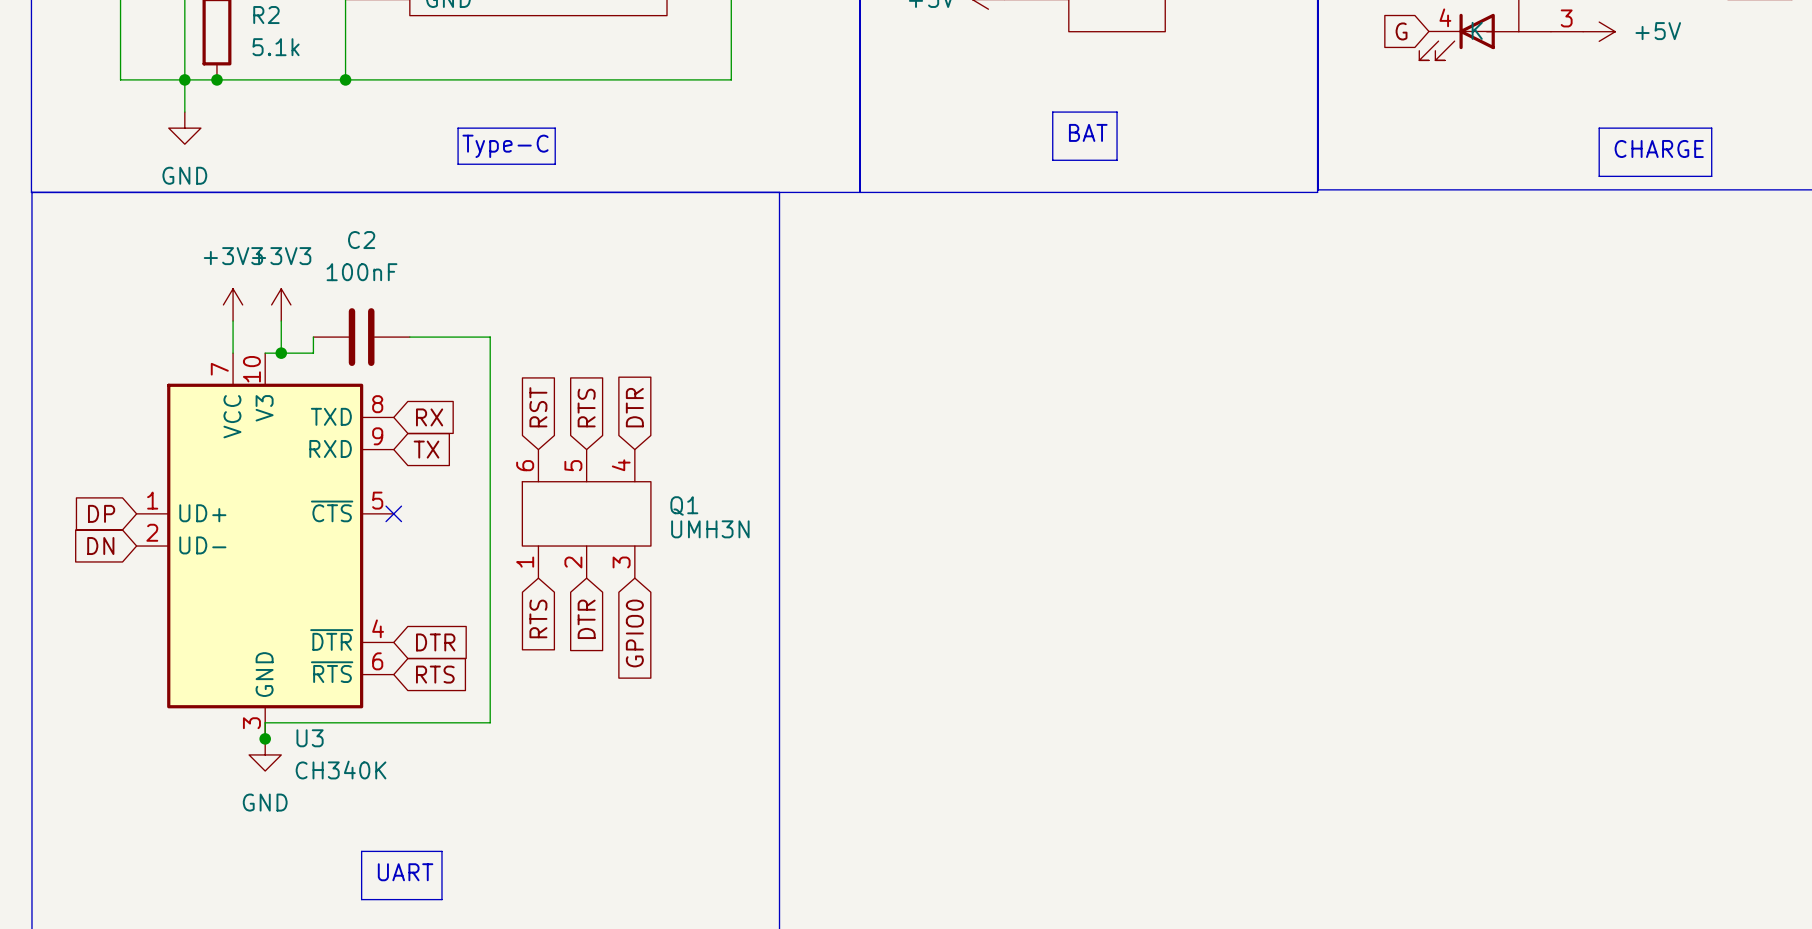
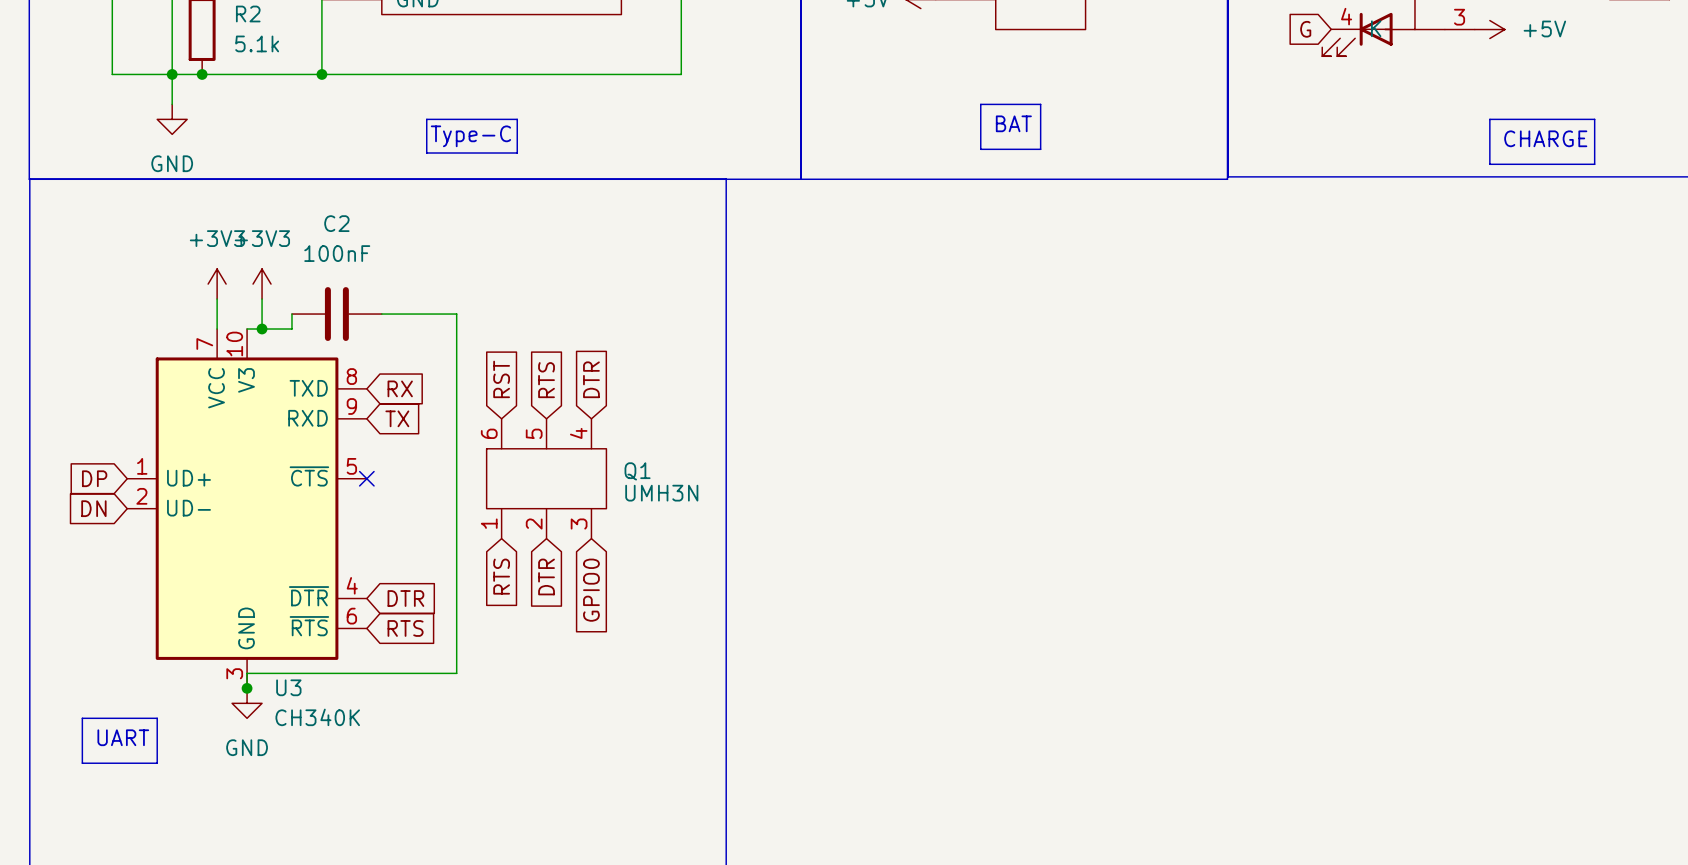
line: (361, 851) (441, 851) (441, 899) (361, 899) (361, 851) -> (82, 718) (157, 718) (157, 763) (82, 763) (82, 718)
text position: UART (405, 872) -> UART (123, 737)

